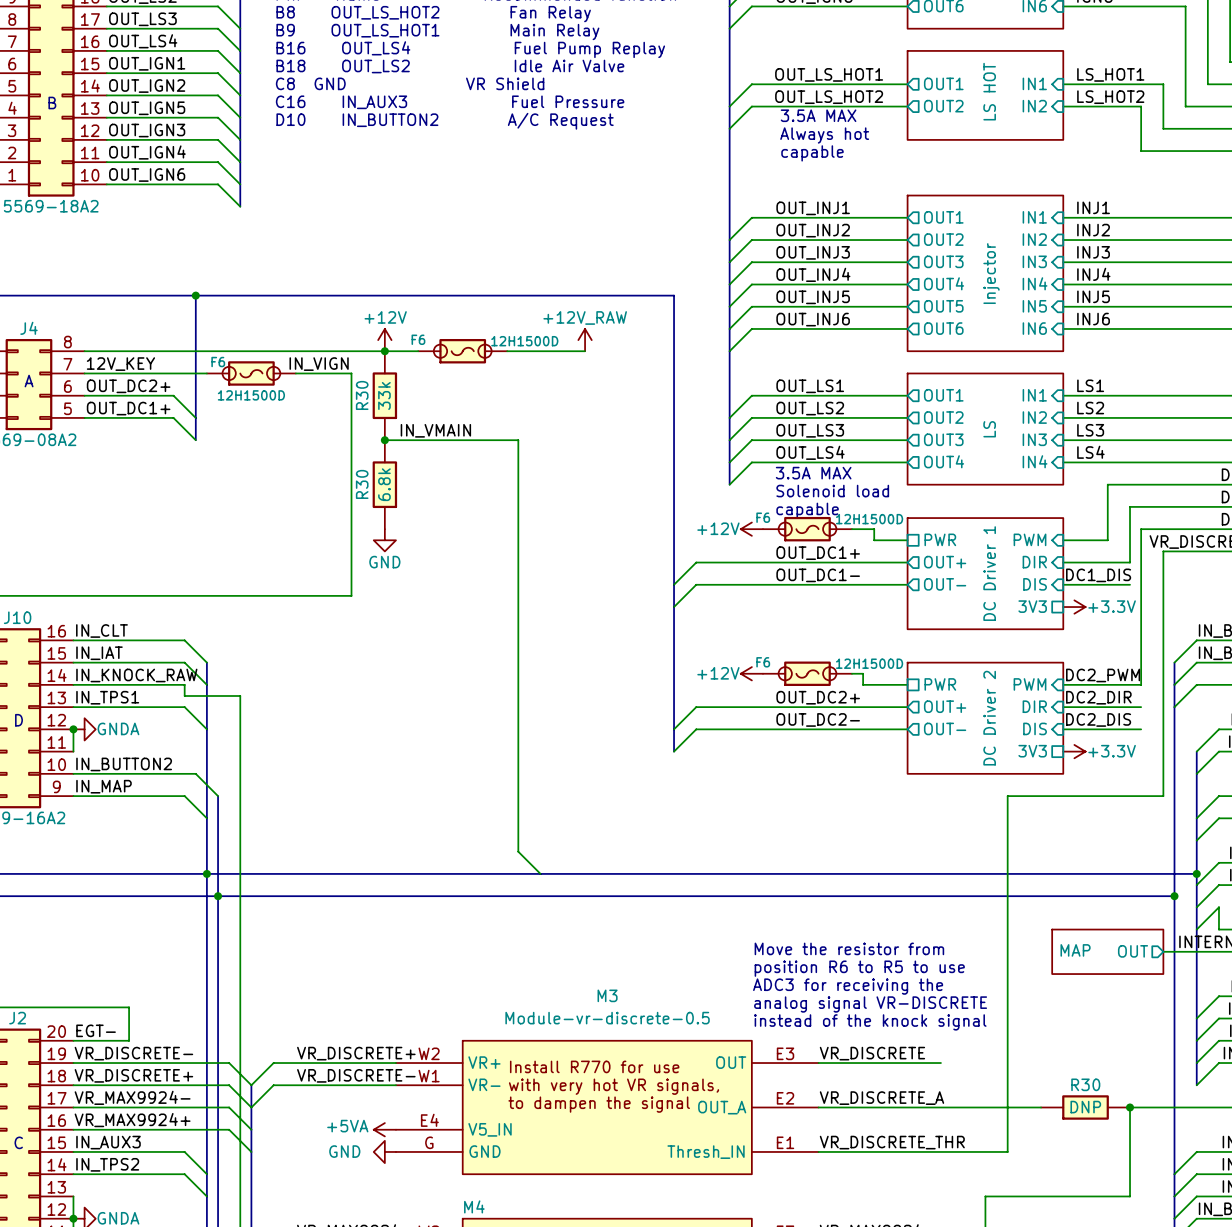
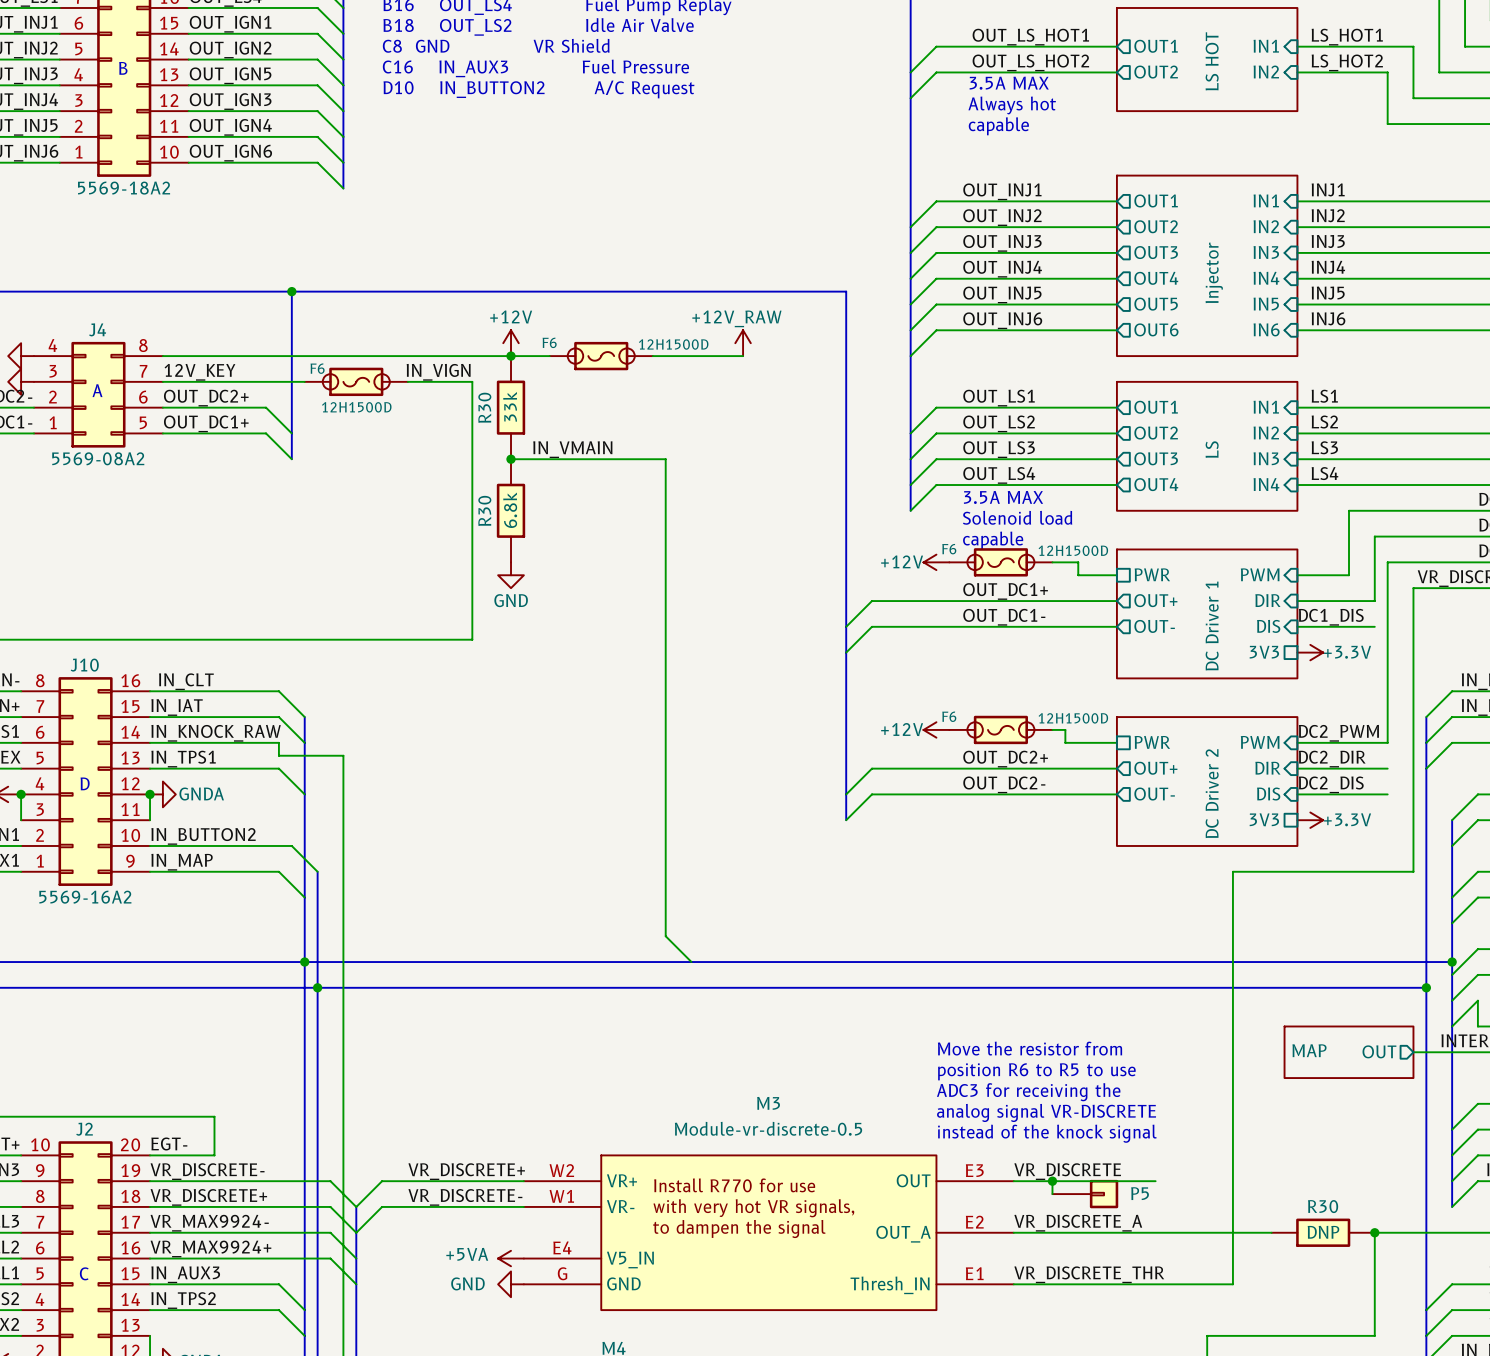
wire: none -> (1052, 1181) (1052, 1194)
junction: none -> (1052, 1181)
P5: none -> (1085, 1194)

